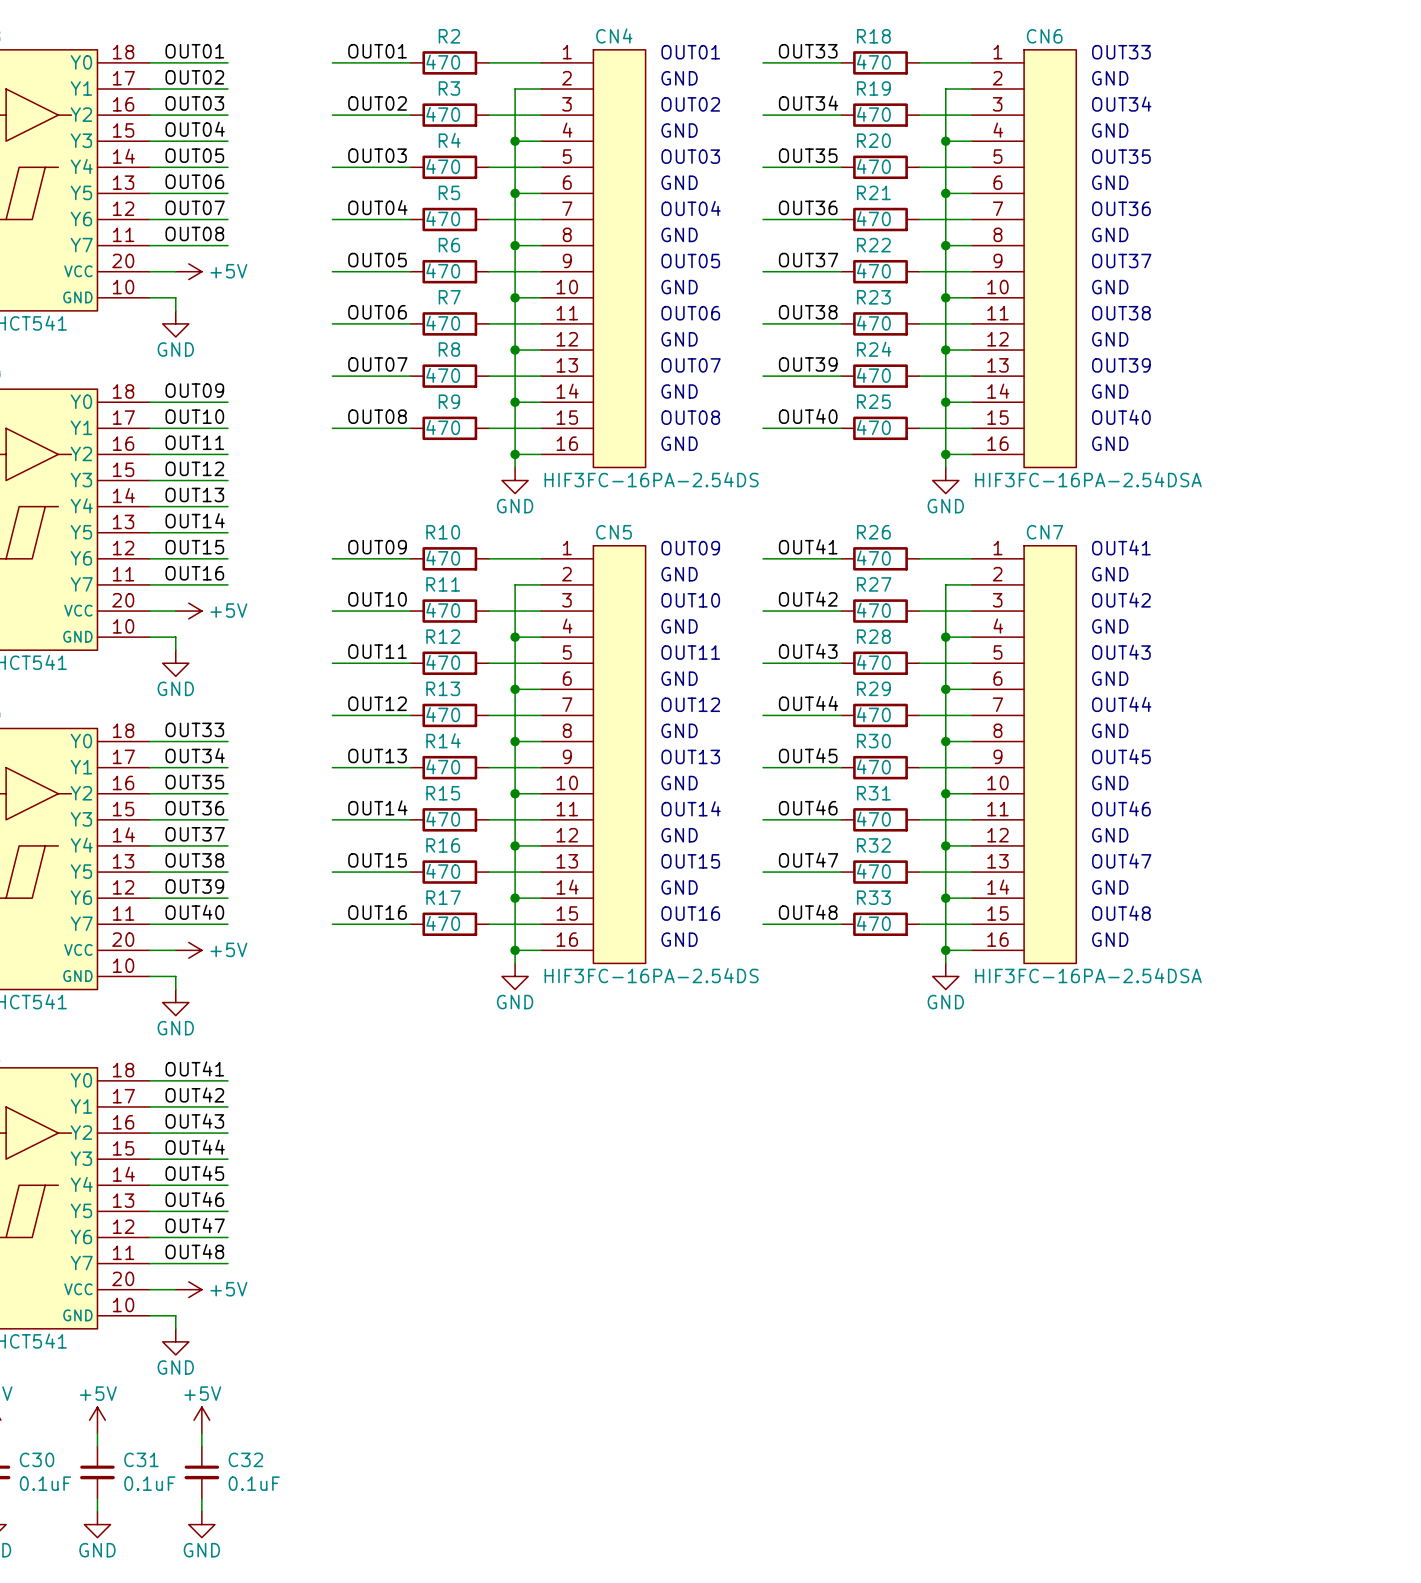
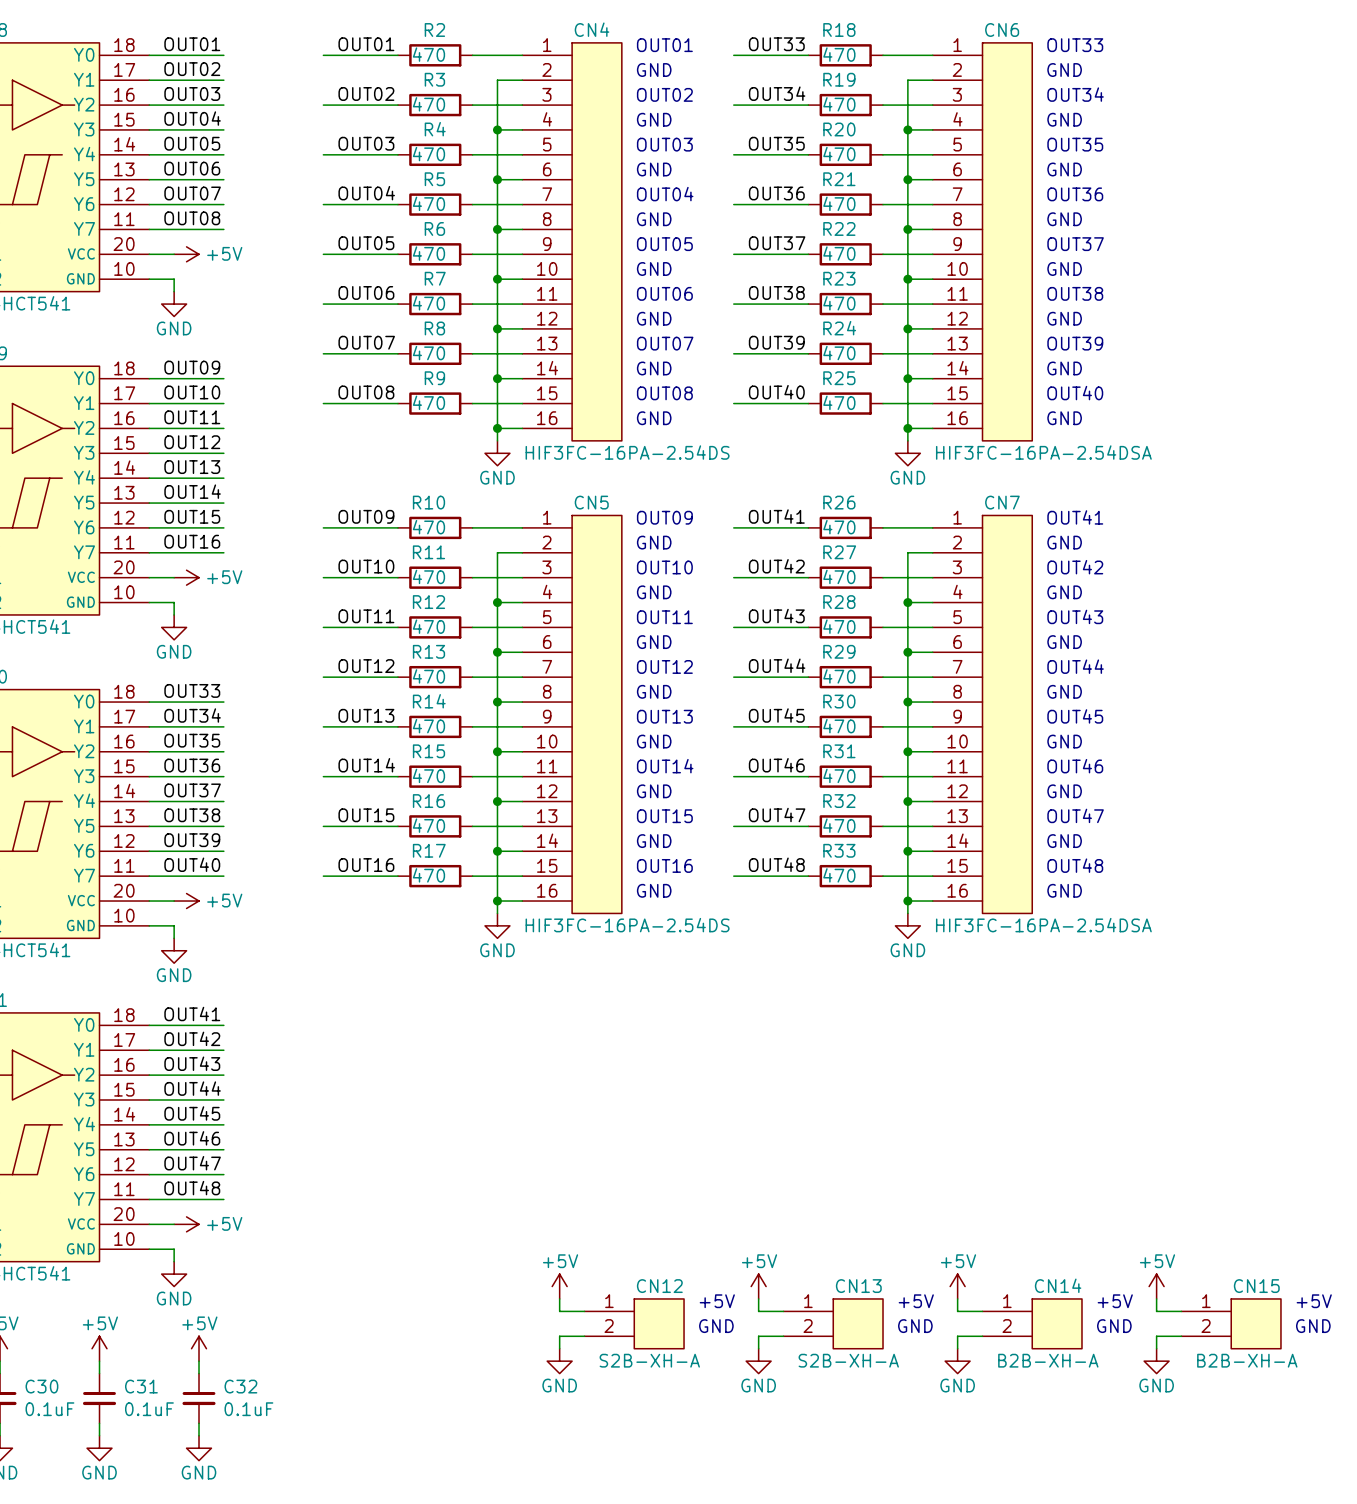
power symbol: none -> +5V (559, 1286)
power symbol: none -> +5V (758, 1286)
power symbol: none -> +5V (957, 1286)
power symbol: none -> +5V (1156, 1286)
wire: none -> (559, 1298) (559, 1311) (584, 1311)
wire: none -> (758, 1298) (758, 1311) (783, 1311)
wire: none -> (957, 1298) (957, 1311) (982, 1311)
wire: none -> (1156, 1298) (1156, 1311) (1181, 1311)
text: none -> +5V (717, 1301)
text: none -> +5V (916, 1301)
text: none -> +5V (1115, 1301)
text: none -> +5V (1314, 1301)
CN12: none -> S2B-XH-A (634, 1323)
CN13: none -> S2B-XH-A (833, 1323)
CN14: none -> B2B-XH-A (1032, 1323)
CN15: none -> B2B-XH-A (1231, 1323)
text: none -> GND (716, 1326)
text: none -> GND (915, 1326)
text: none -> GND (1114, 1326)
text: none -> GND (1313, 1326)
wire: none -> (584, 1336) (559, 1336) (559, 1348)
wire: none -> (783, 1336) (758, 1336) (758, 1348)
wire: none -> (982, 1336) (957, 1336) (957, 1348)
wire: none -> (1181, 1336) (1156, 1336) (1156, 1348)
power symbol: none -> GND (559, 1361)
power symbol: none -> GND (758, 1361)
power symbol: none -> GND (957, 1361)
power symbol: none -> GND (1156, 1361)

